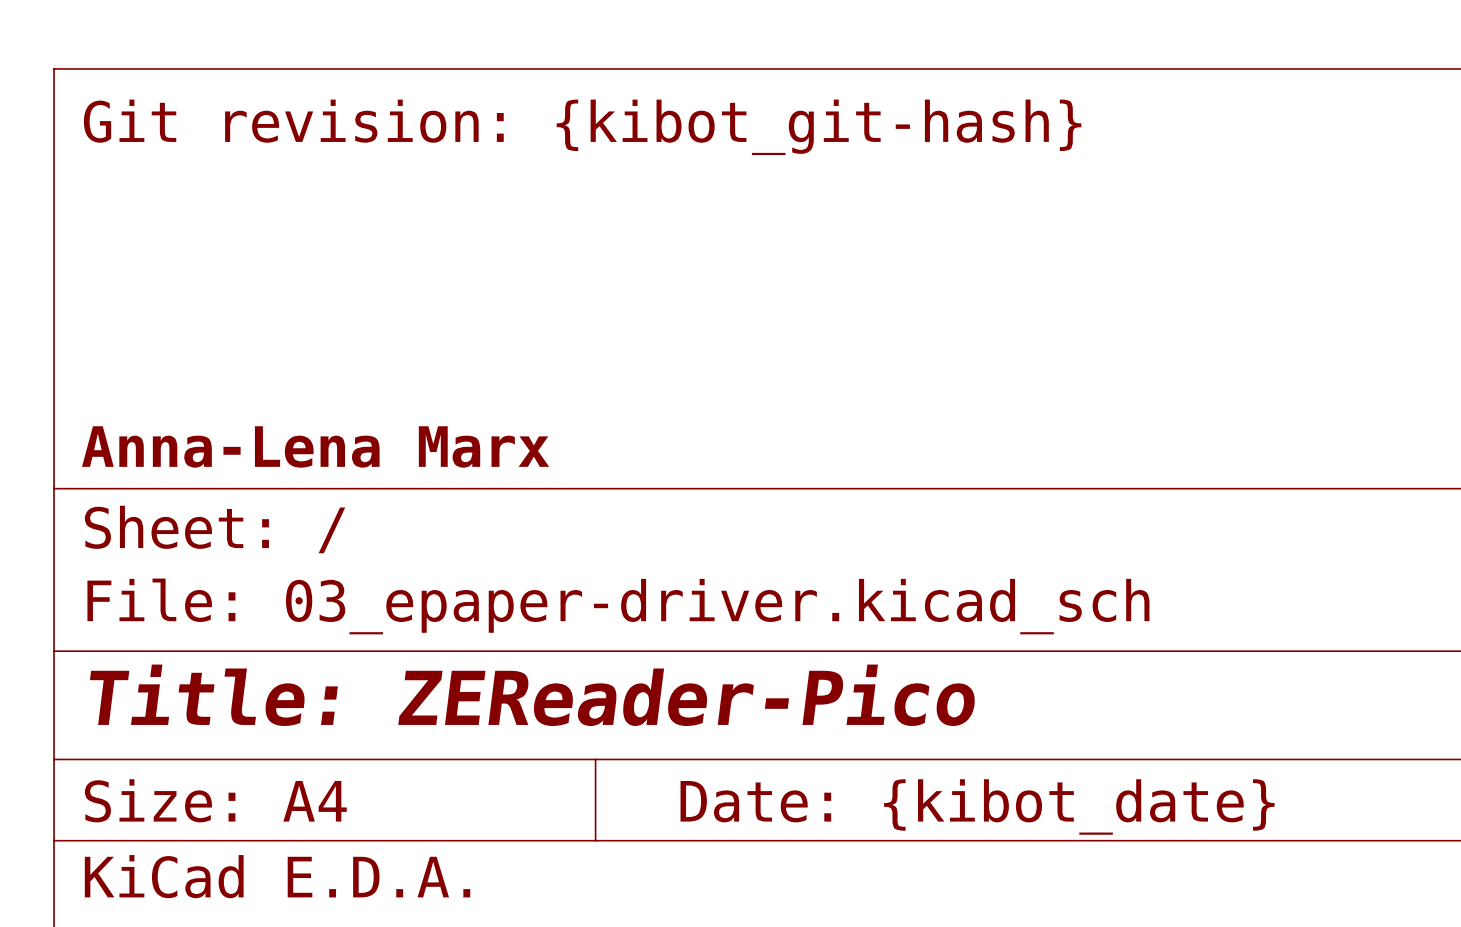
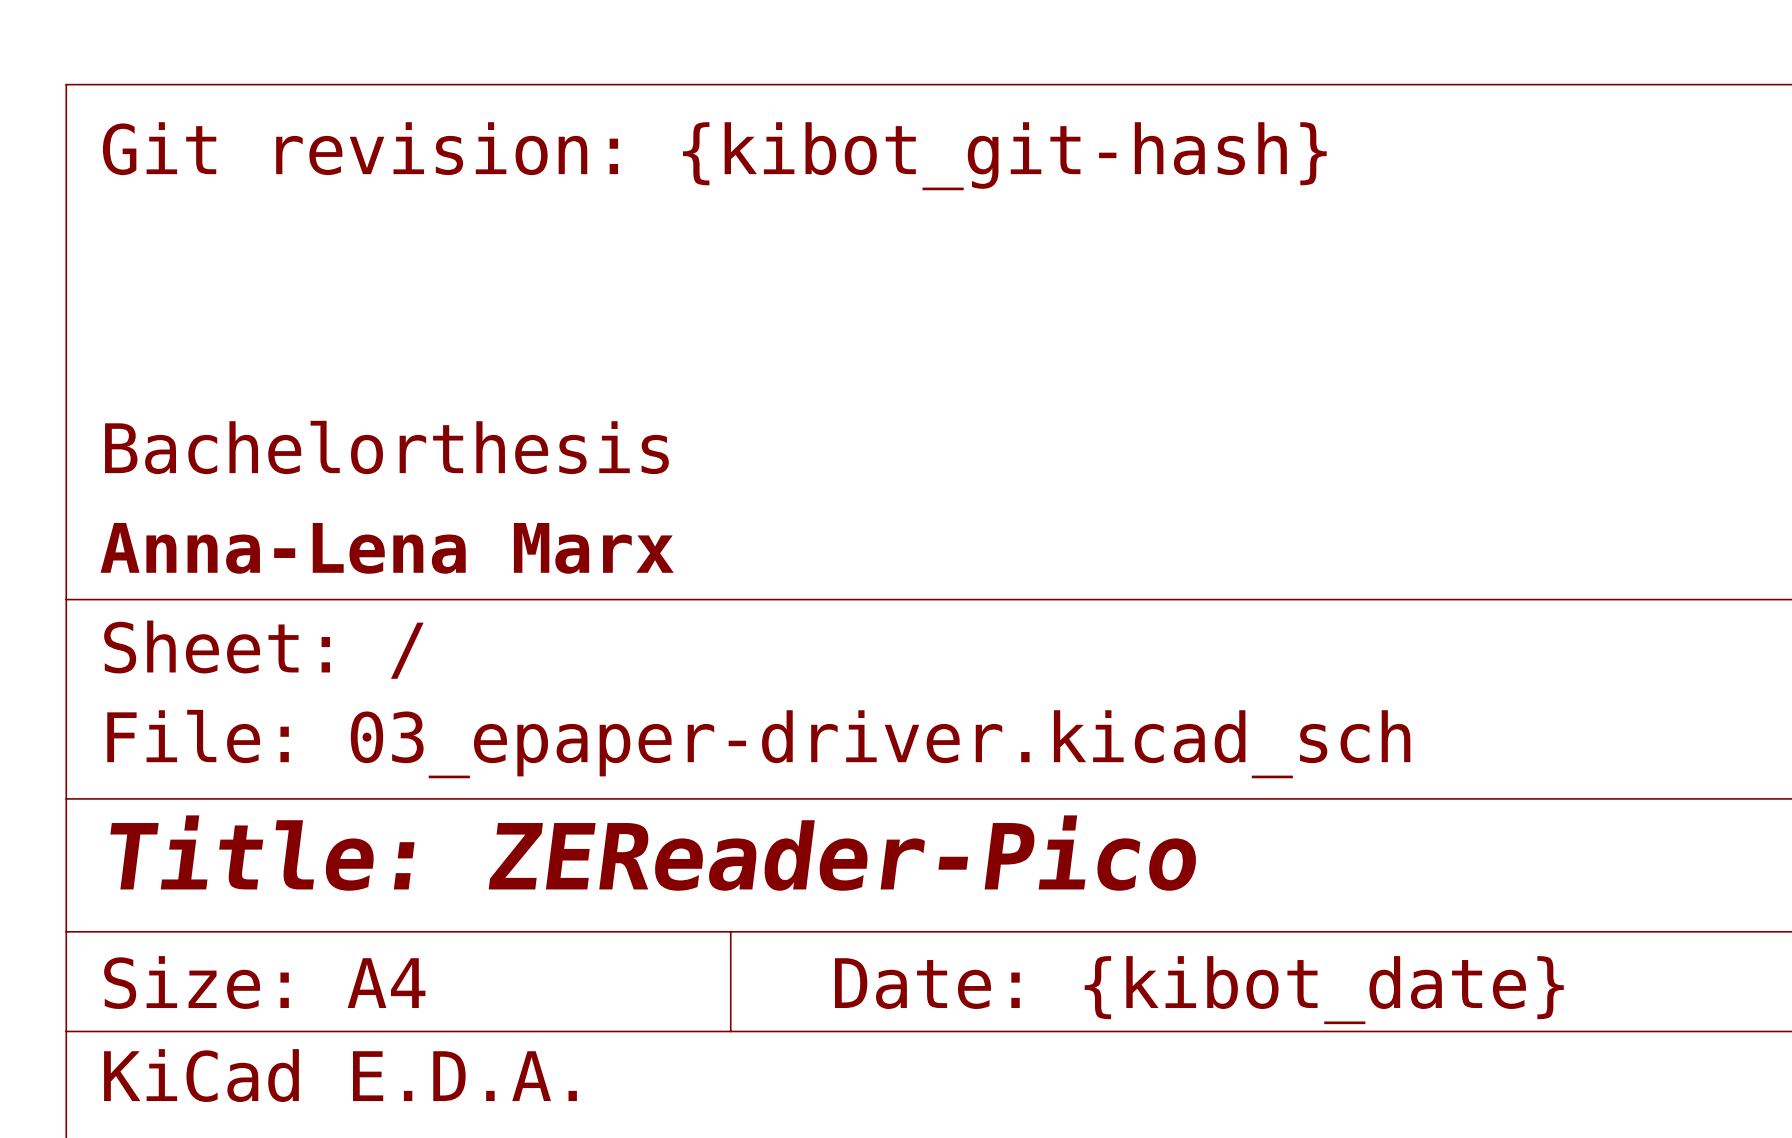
title block: none -> Bachelorthesis (386, 447)

